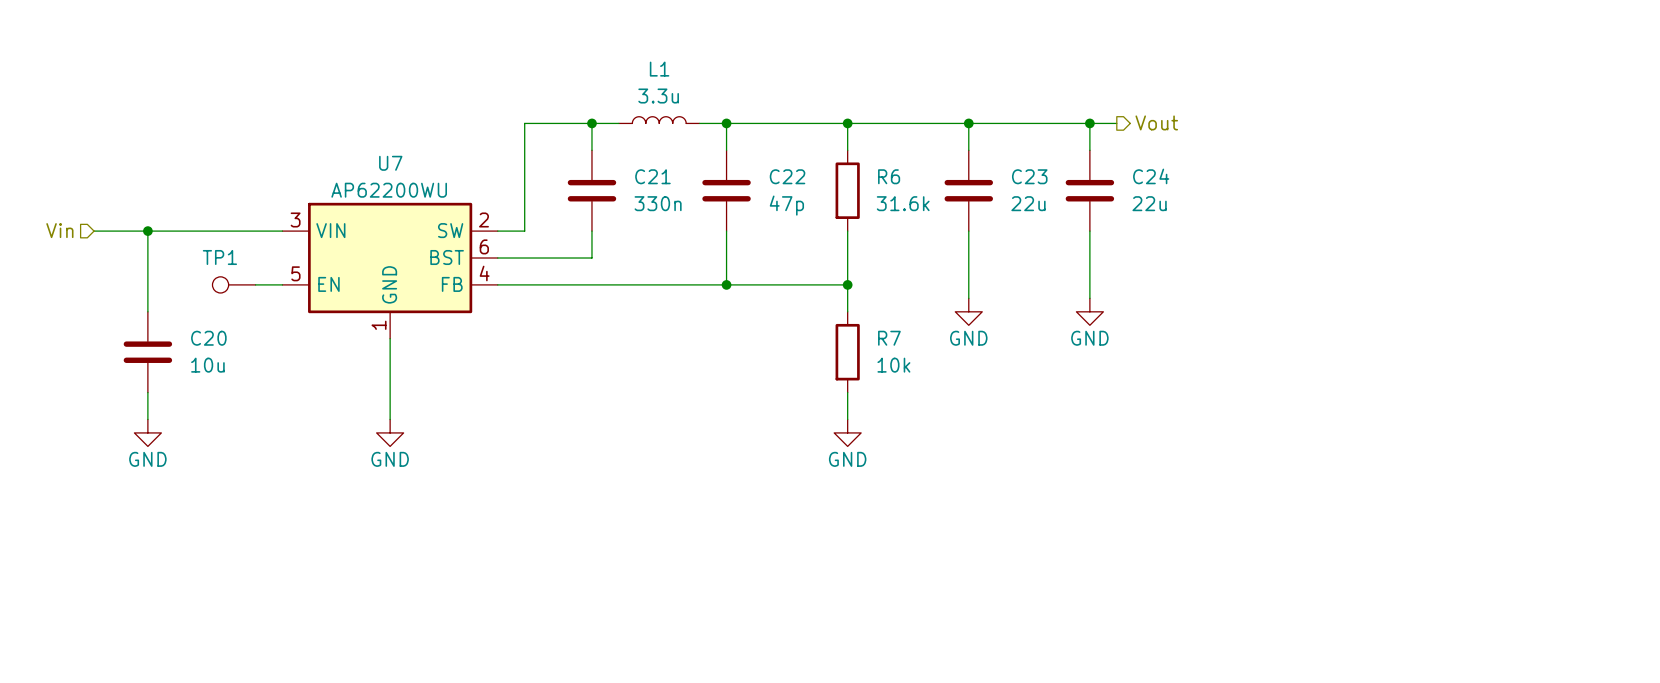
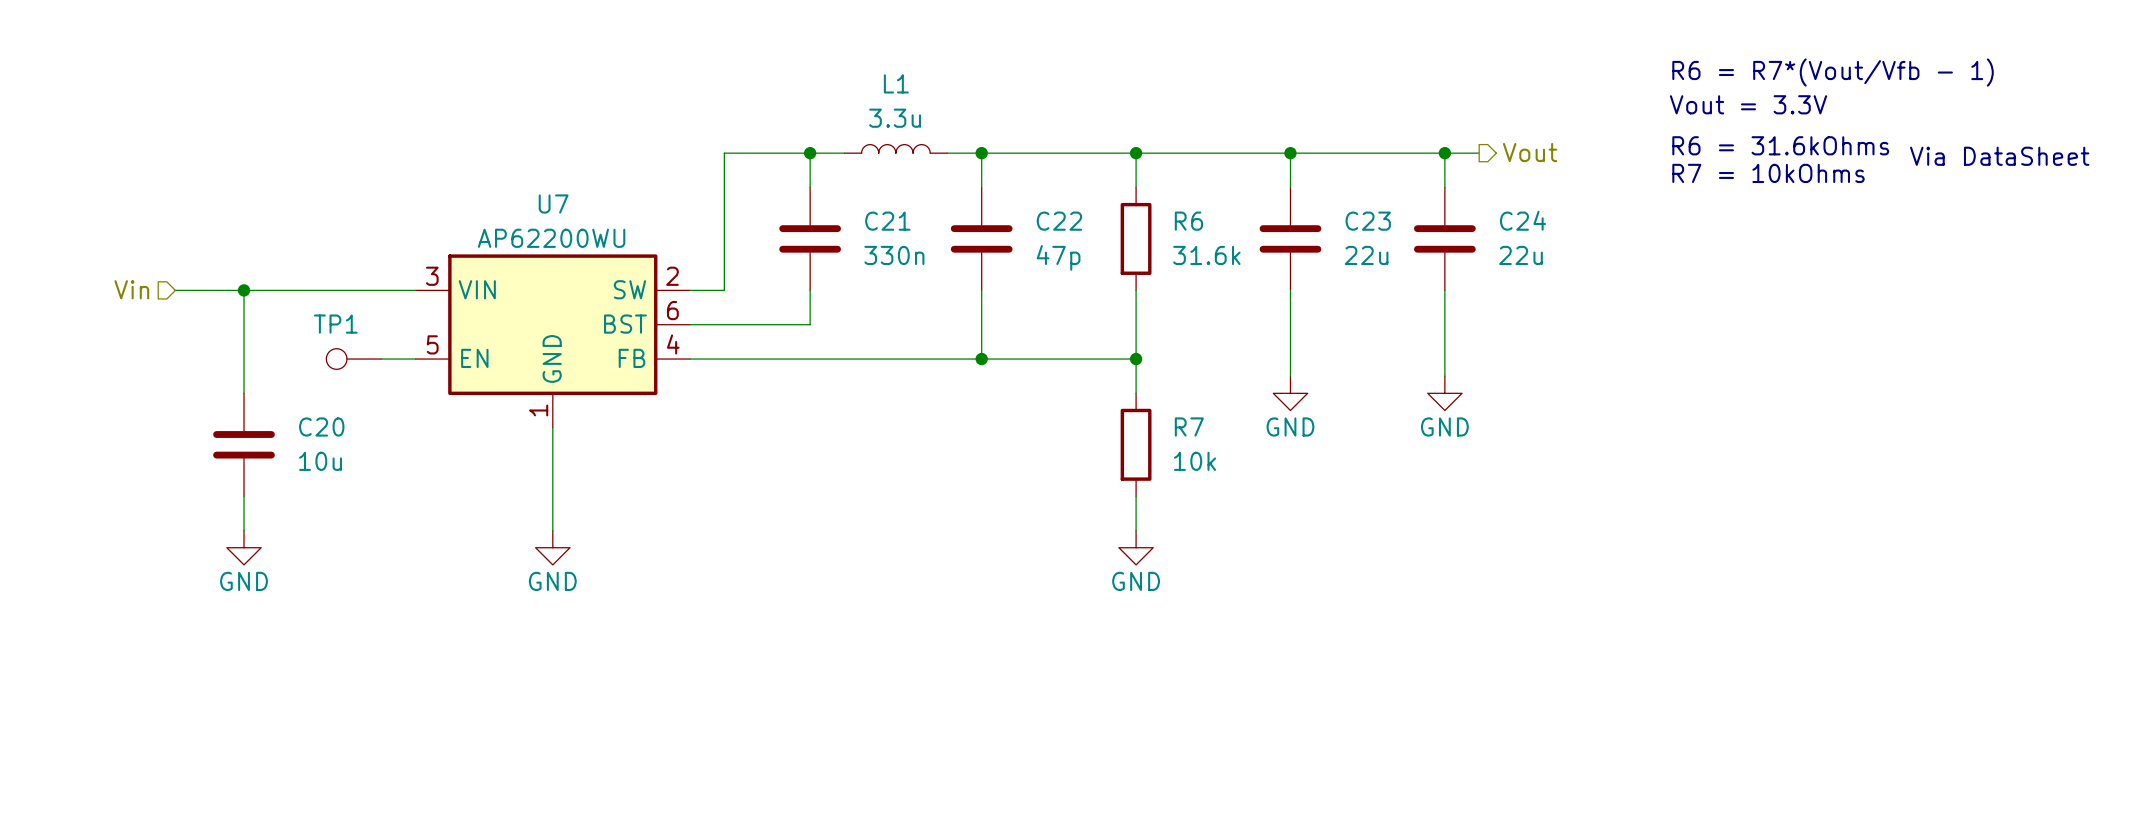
text: none -> R6 = R7*(Vout/Vfb - 1) (1833, 72)
text: none -> Vout = 3.3V (1748, 104)
text: none -> R6 = 31.6kOhms (1780, 145)
text: none -> Via DataSheet (1999, 156)
text: none -> R7 = 10kOhms (1768, 173)

